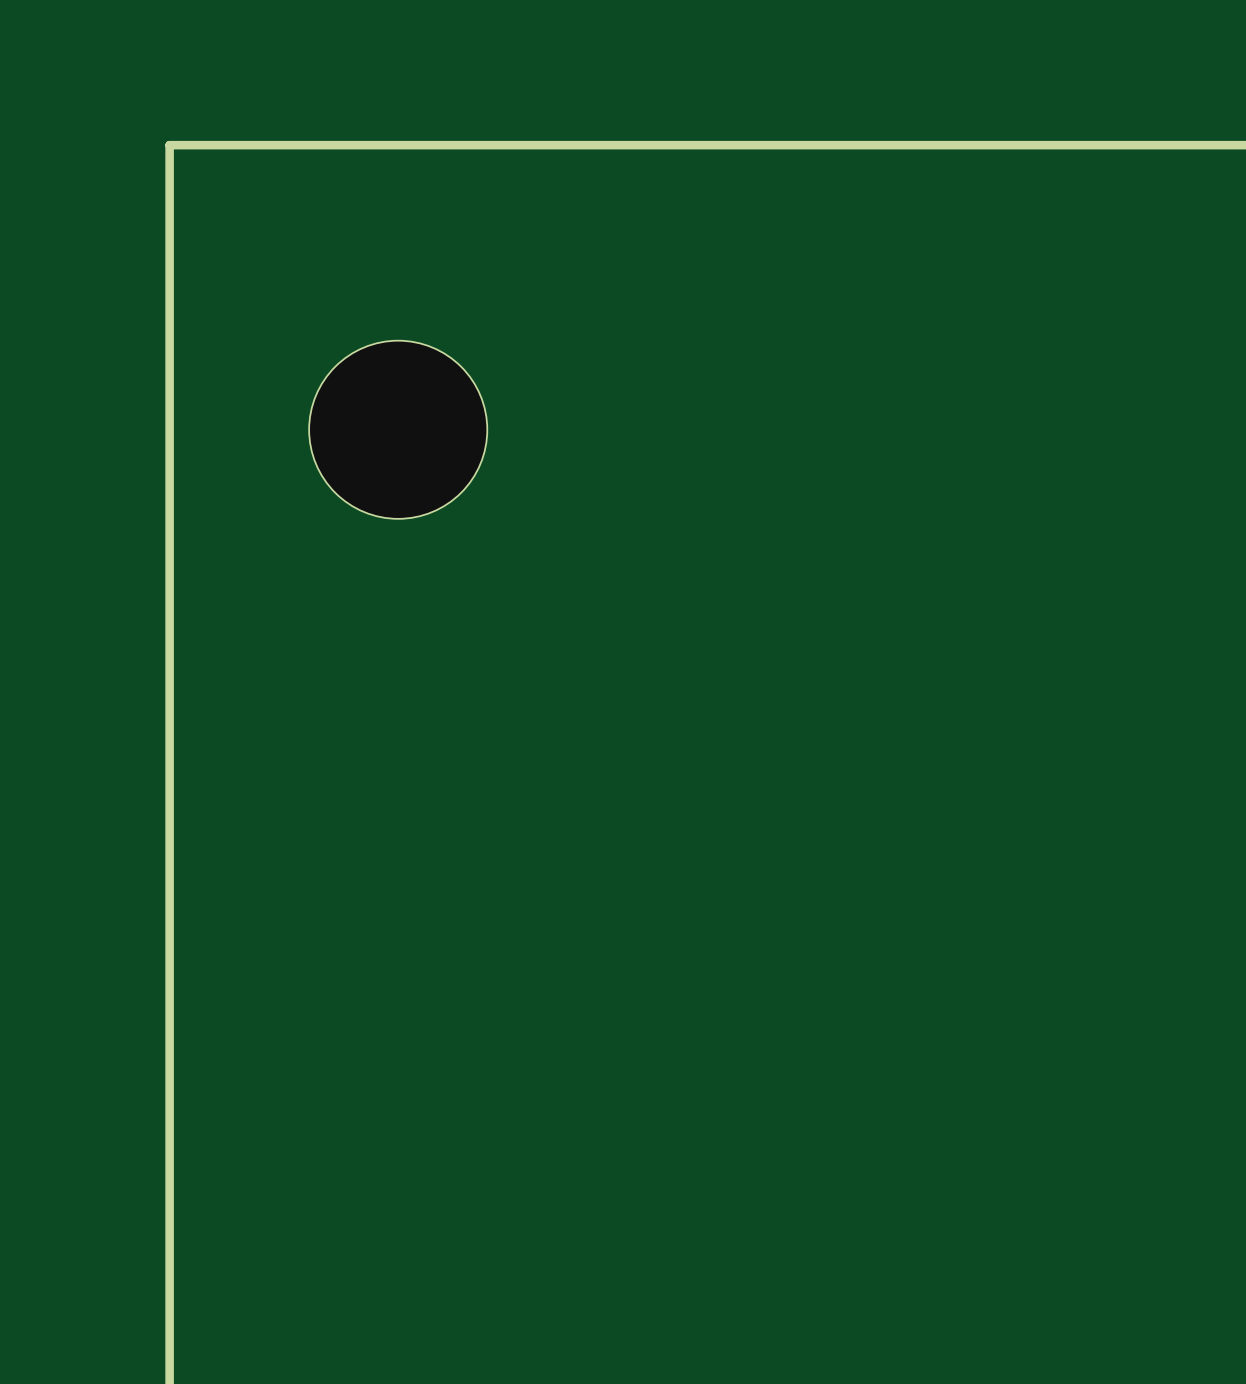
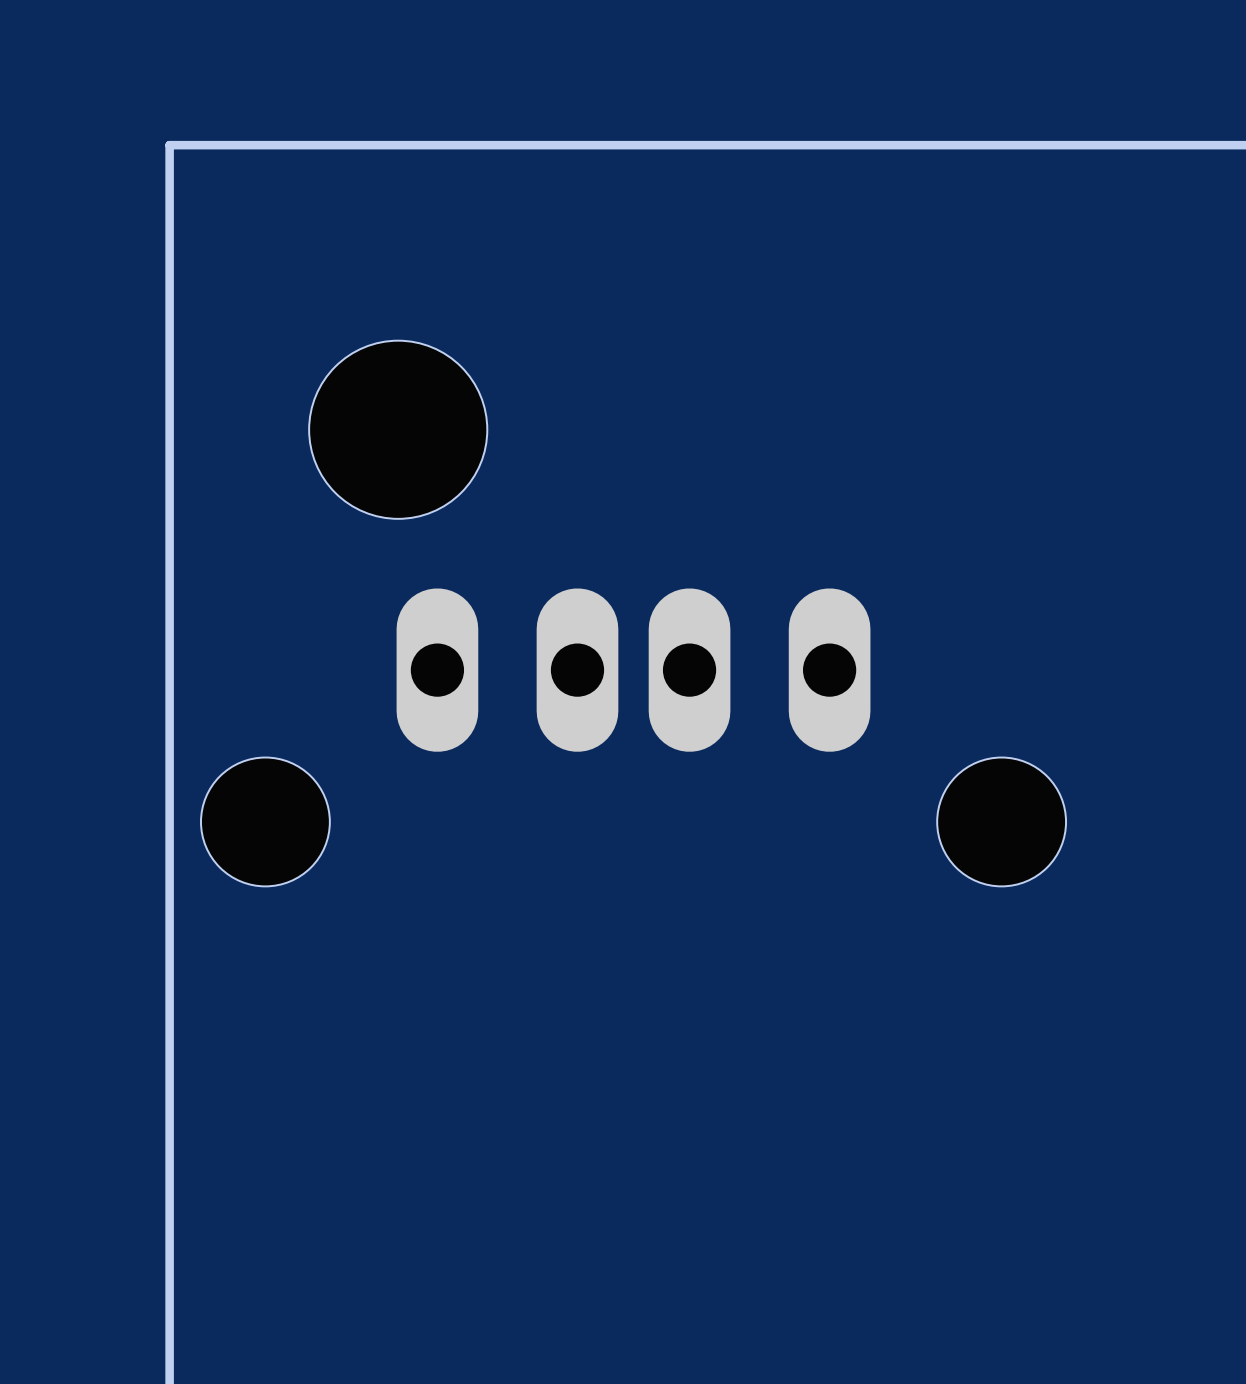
part: none -> (633, 737)

